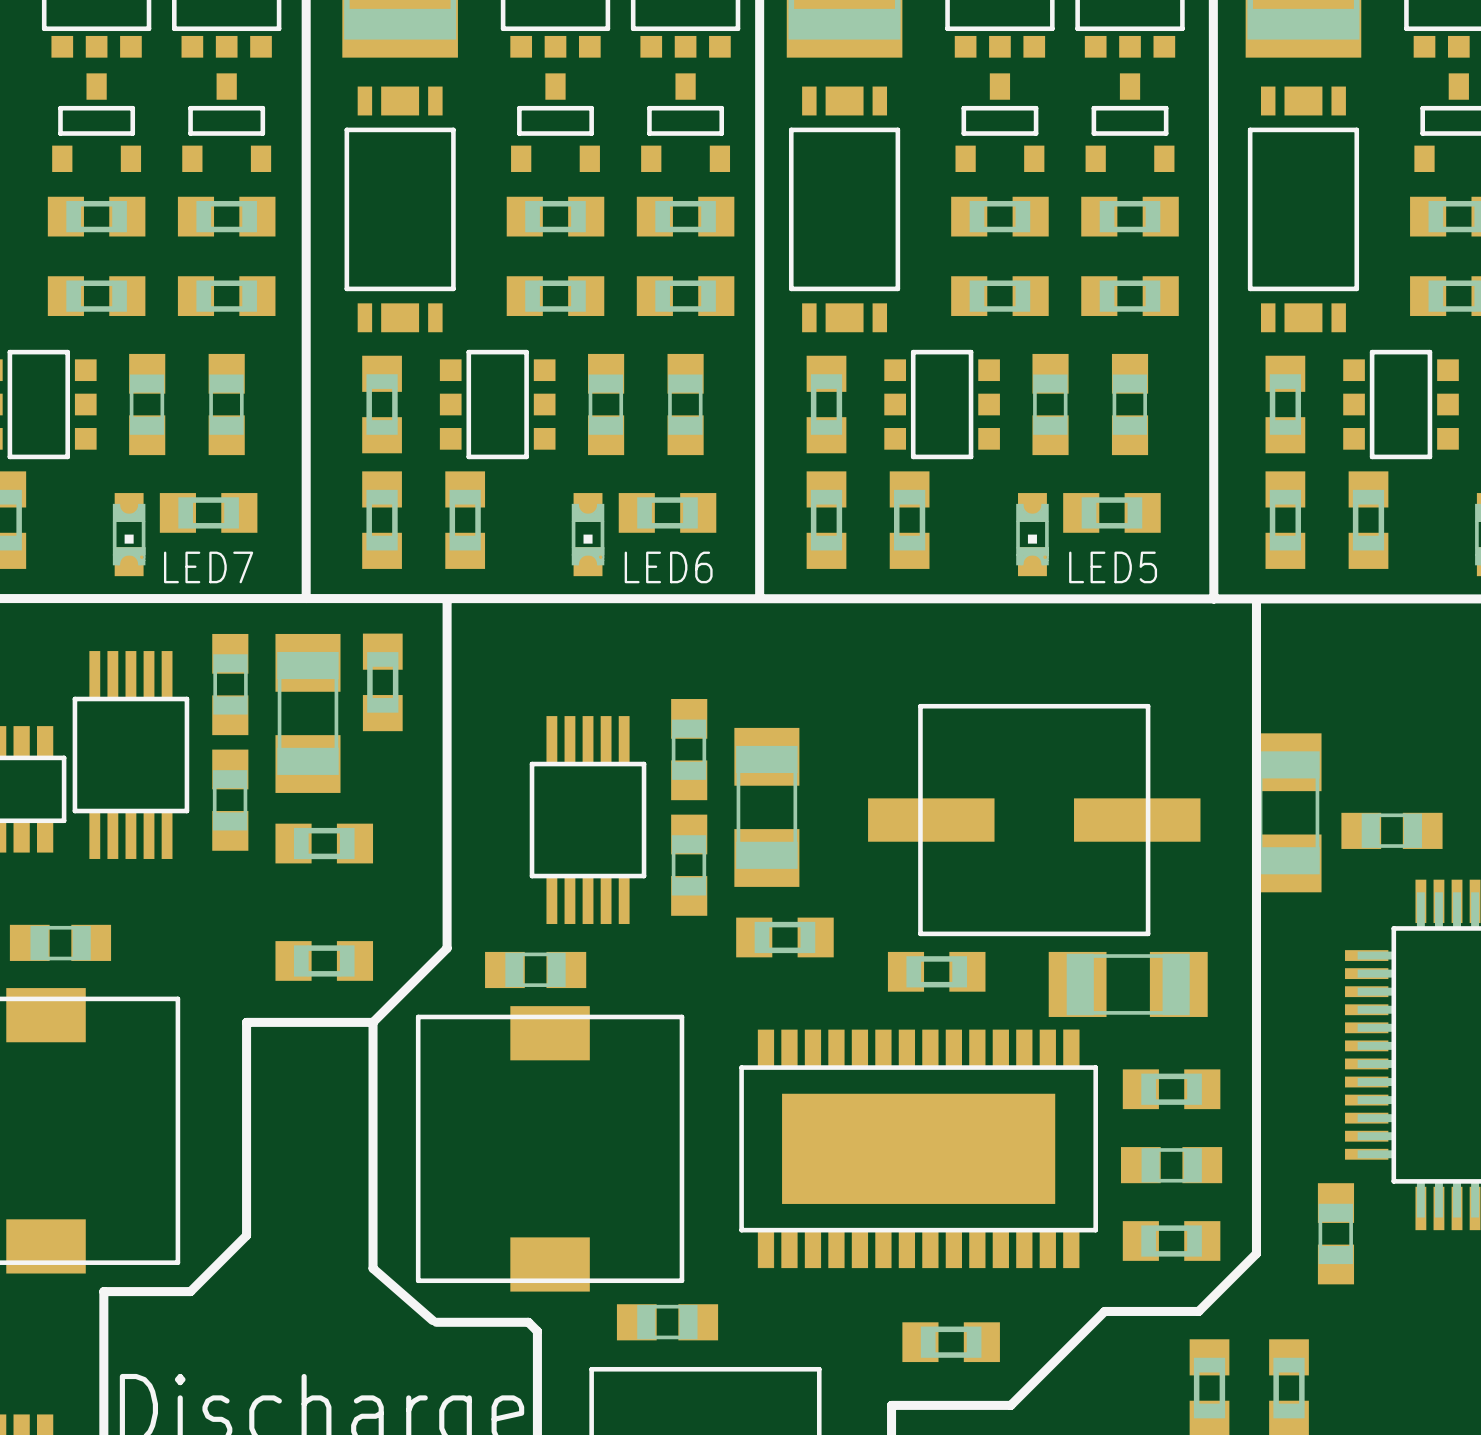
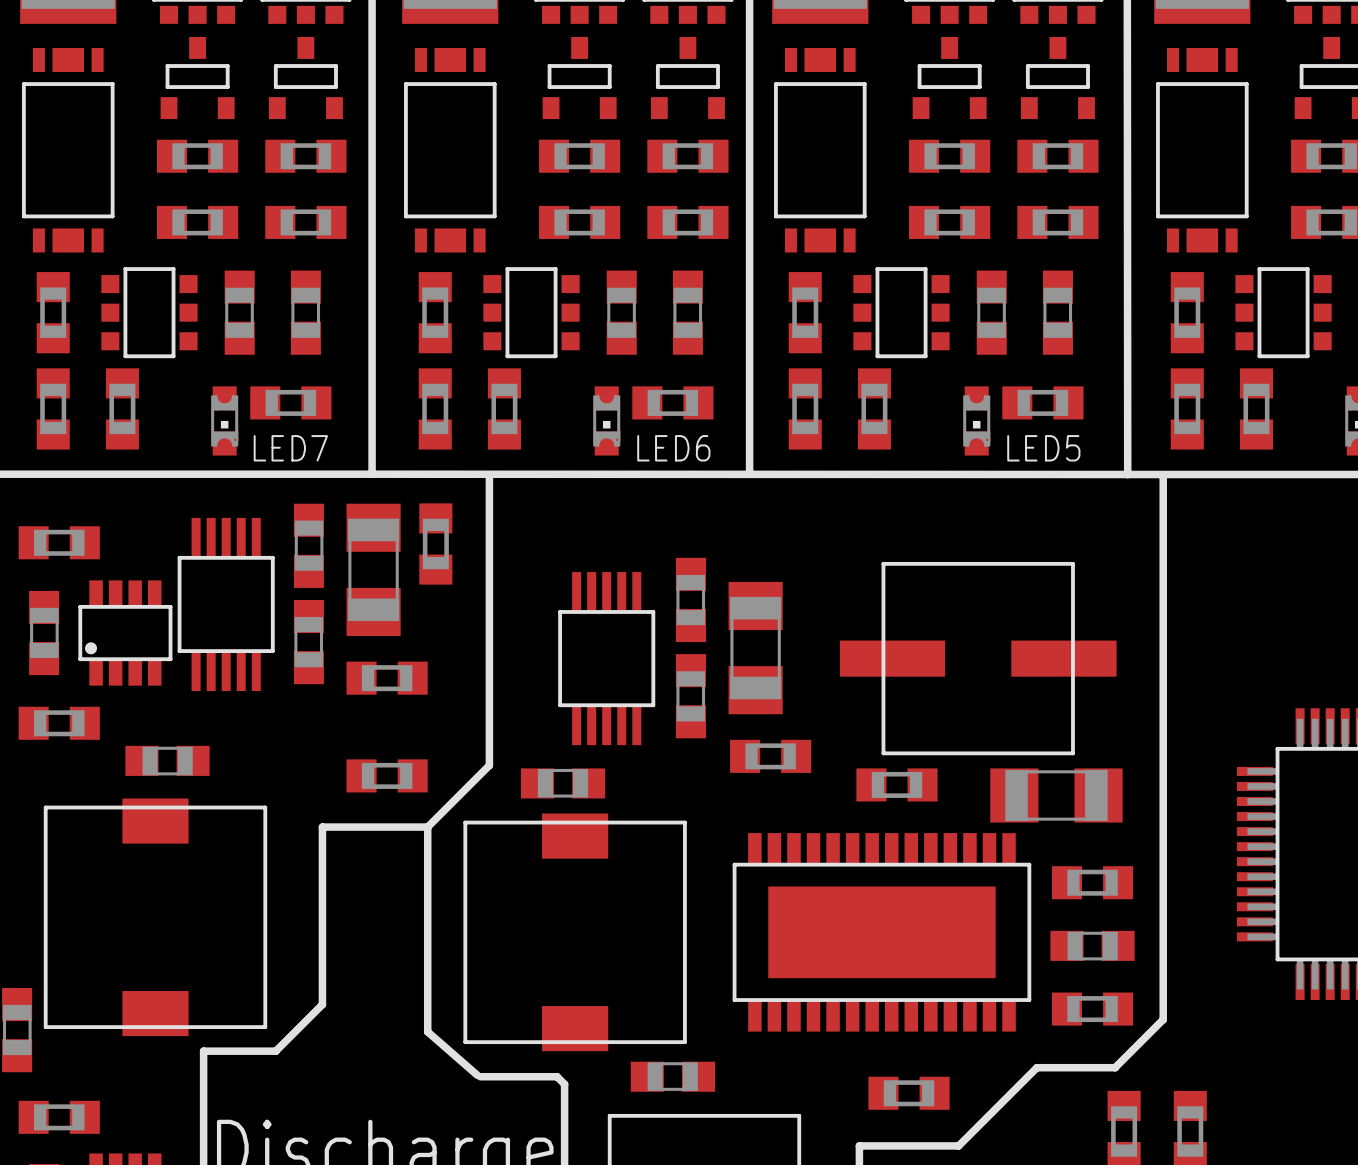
part: (1289, 812) -> none
part: (1391, 830) -> none
part: (1335, 1233) -> none

